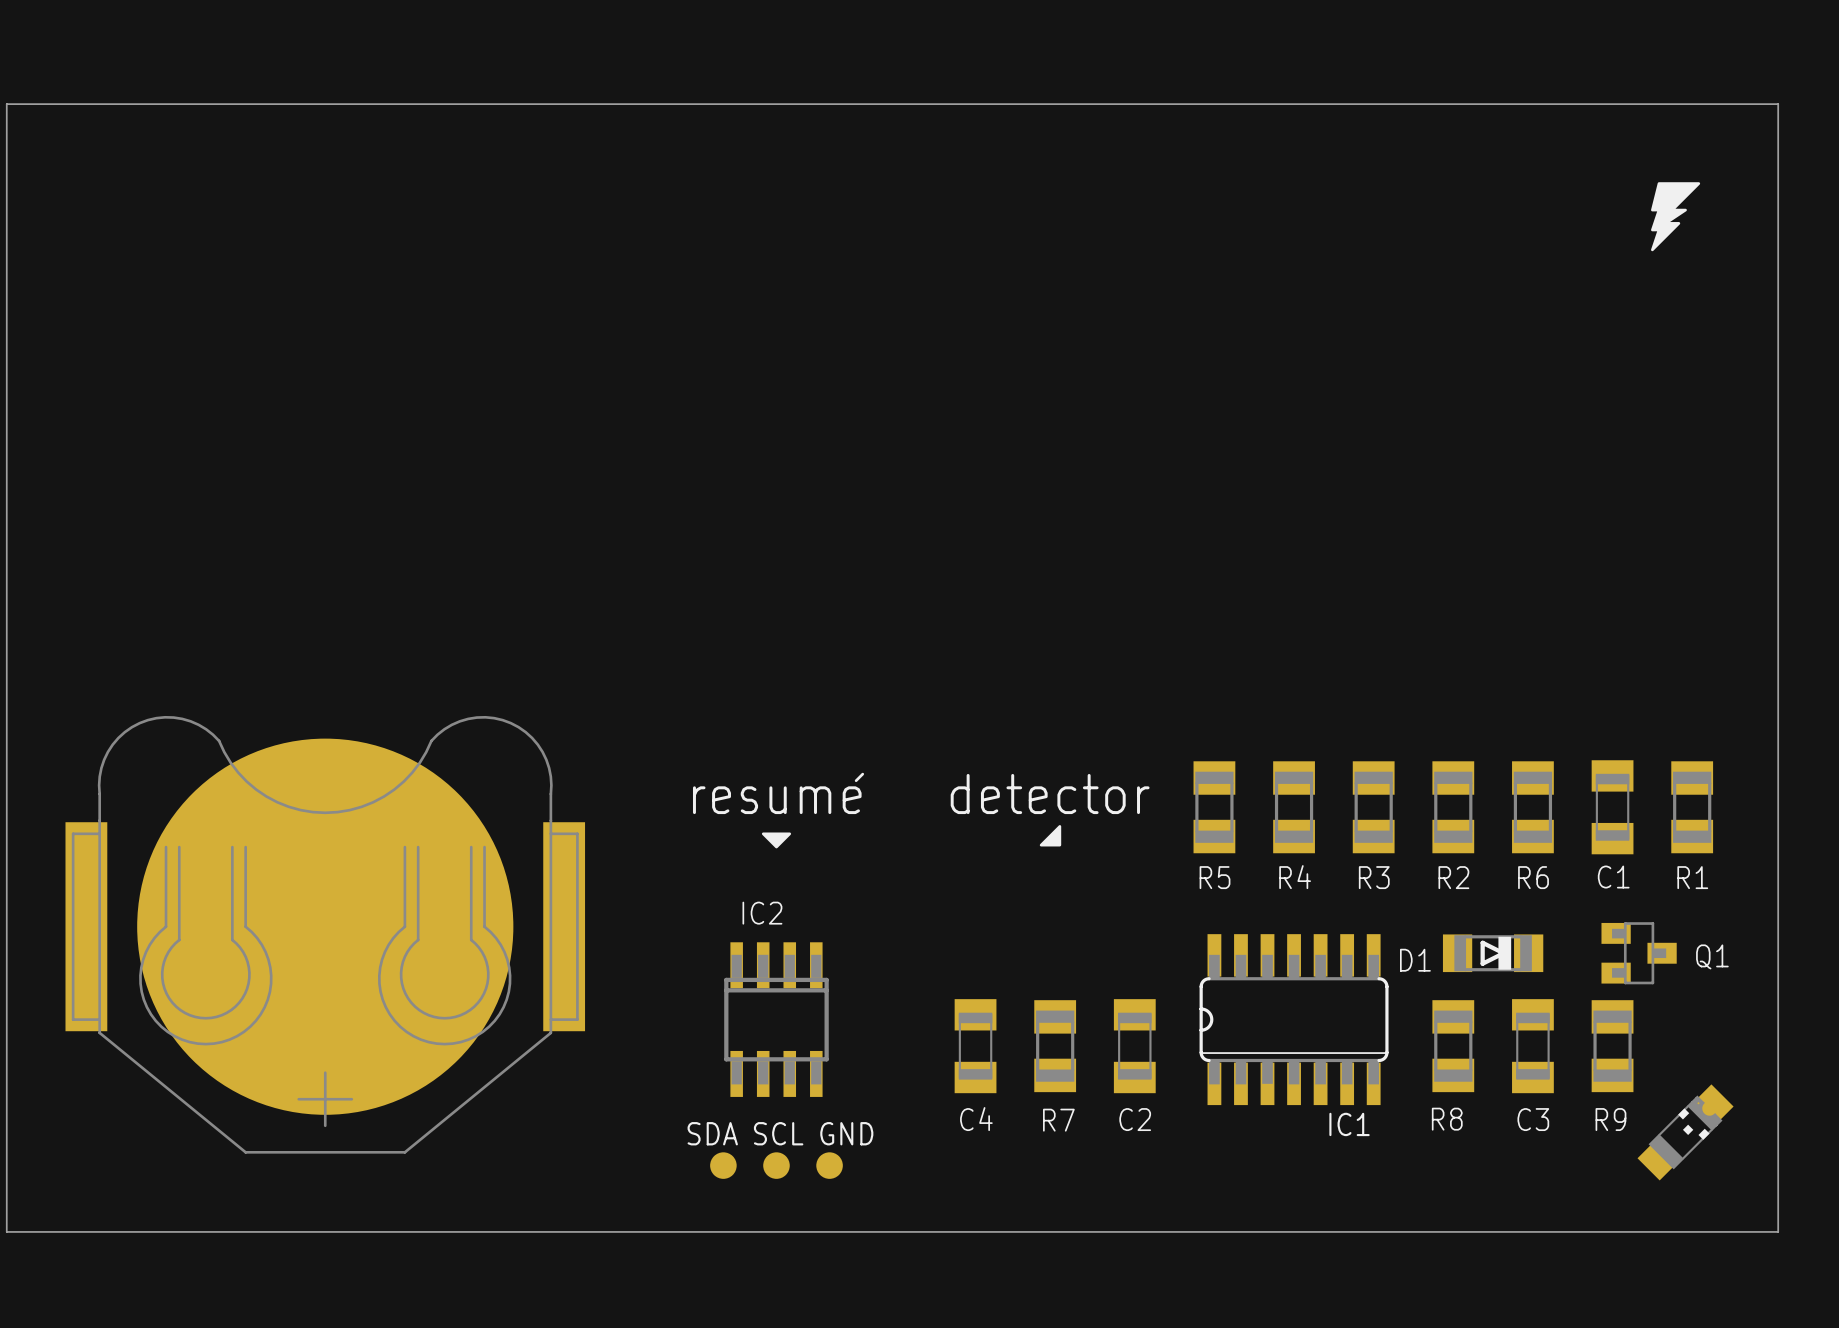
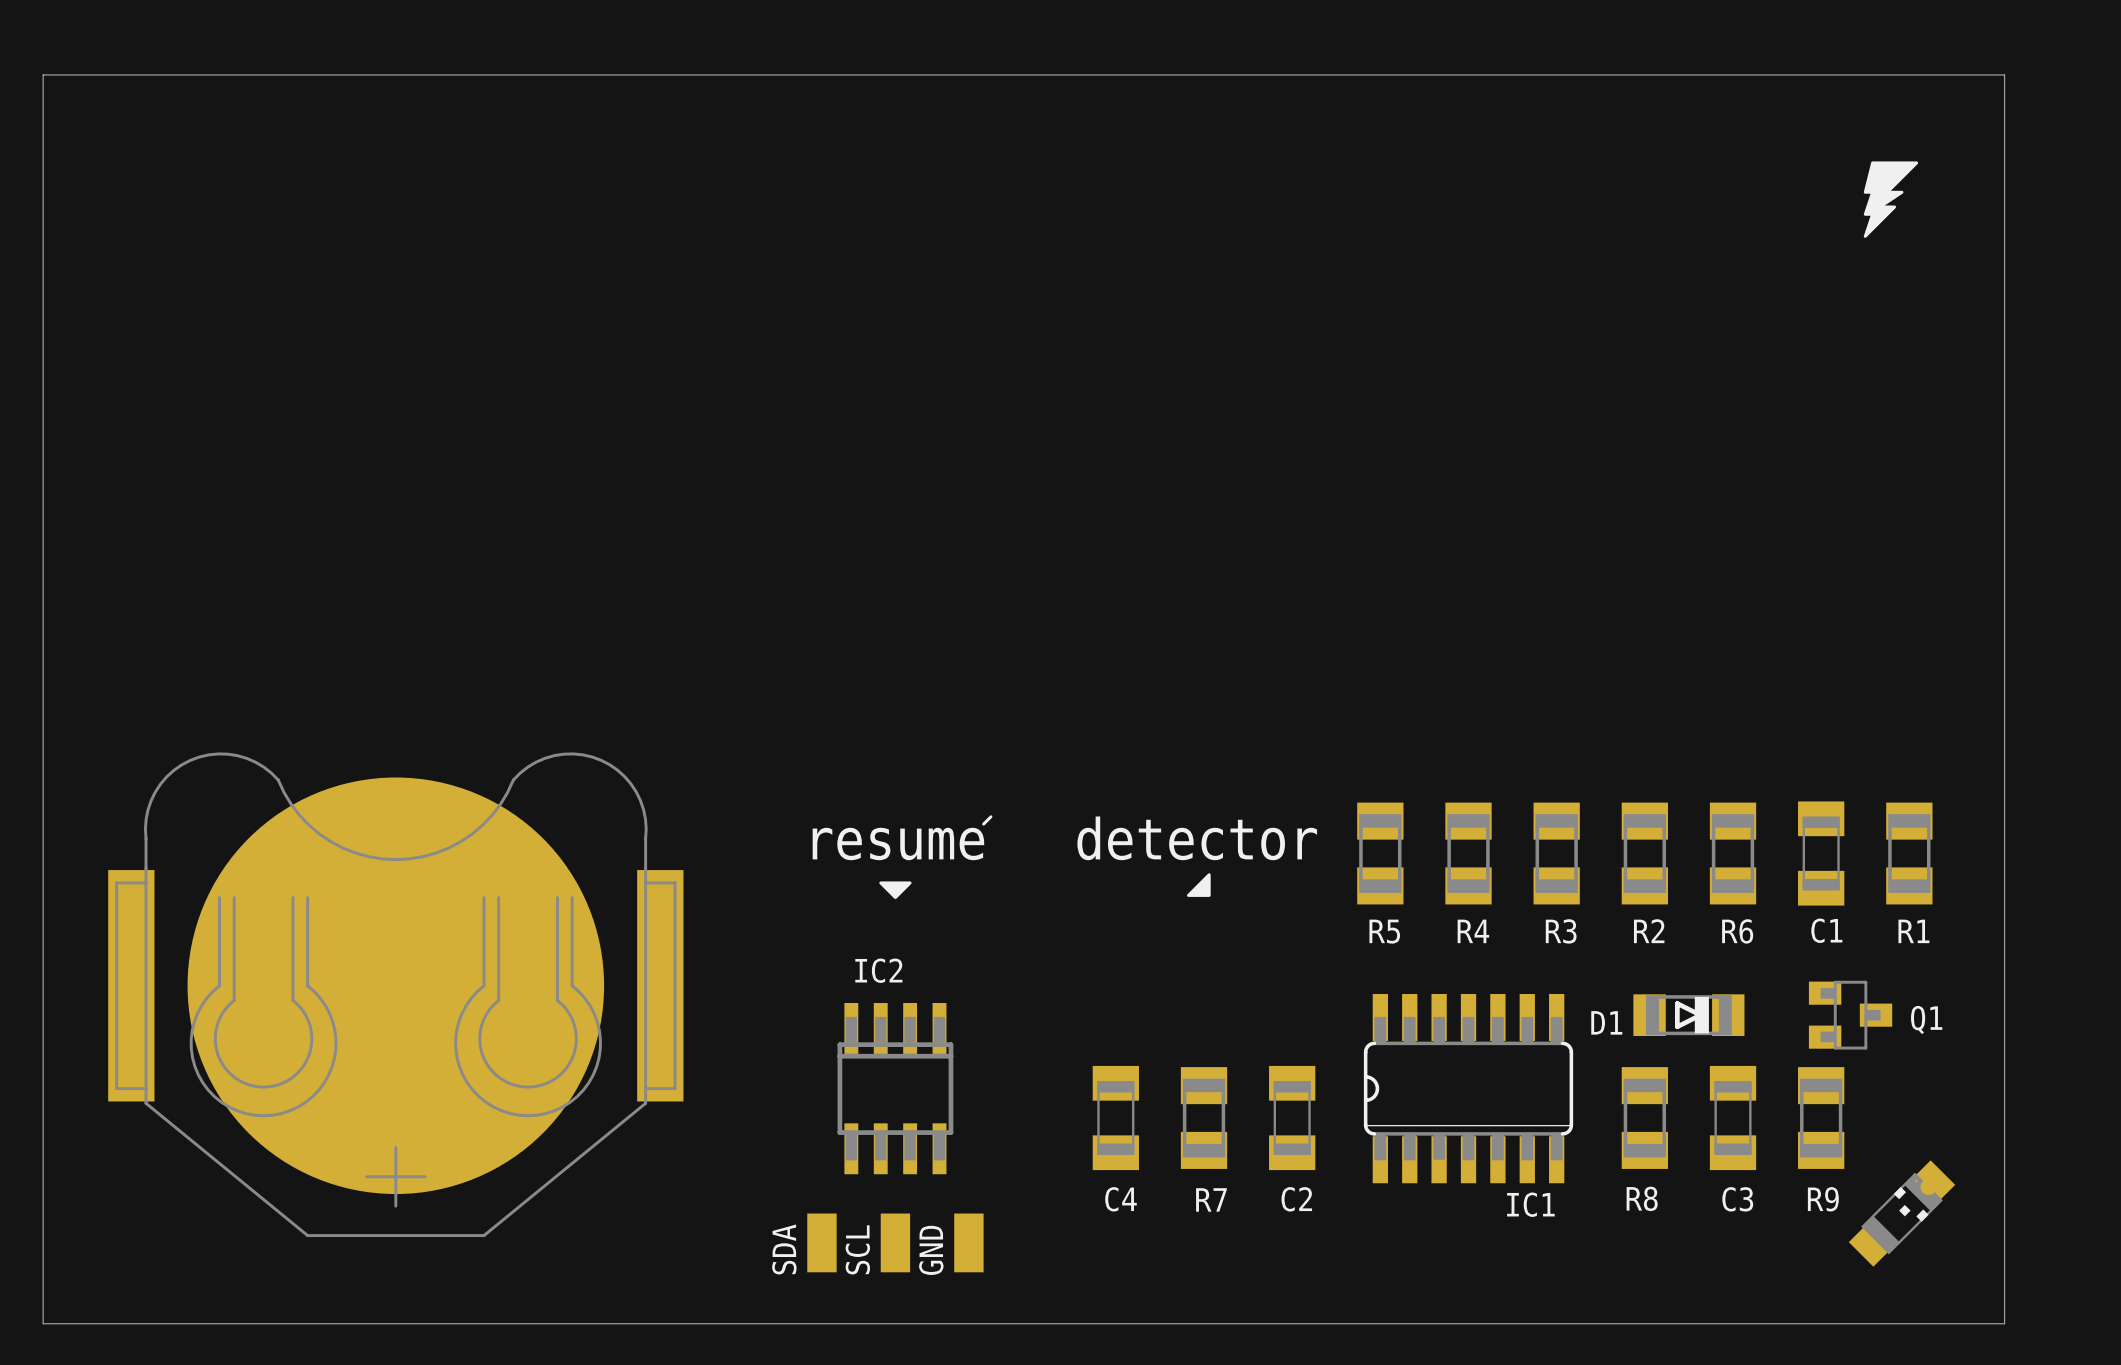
SCL name position: SCL (778, 1133) -> SCL (857, 1249)
GND name position: GND (846, 1133) -> GND (931, 1250)
SDA footprint: [710, 1152, 737, 1179] -> [807, 1213, 837, 1273]
SCL footprint: [763, 1152, 790, 1179] -> [880, 1213, 911, 1273]
GND footprint: [816, 1152, 843, 1179] -> [954, 1213, 984, 1273]

